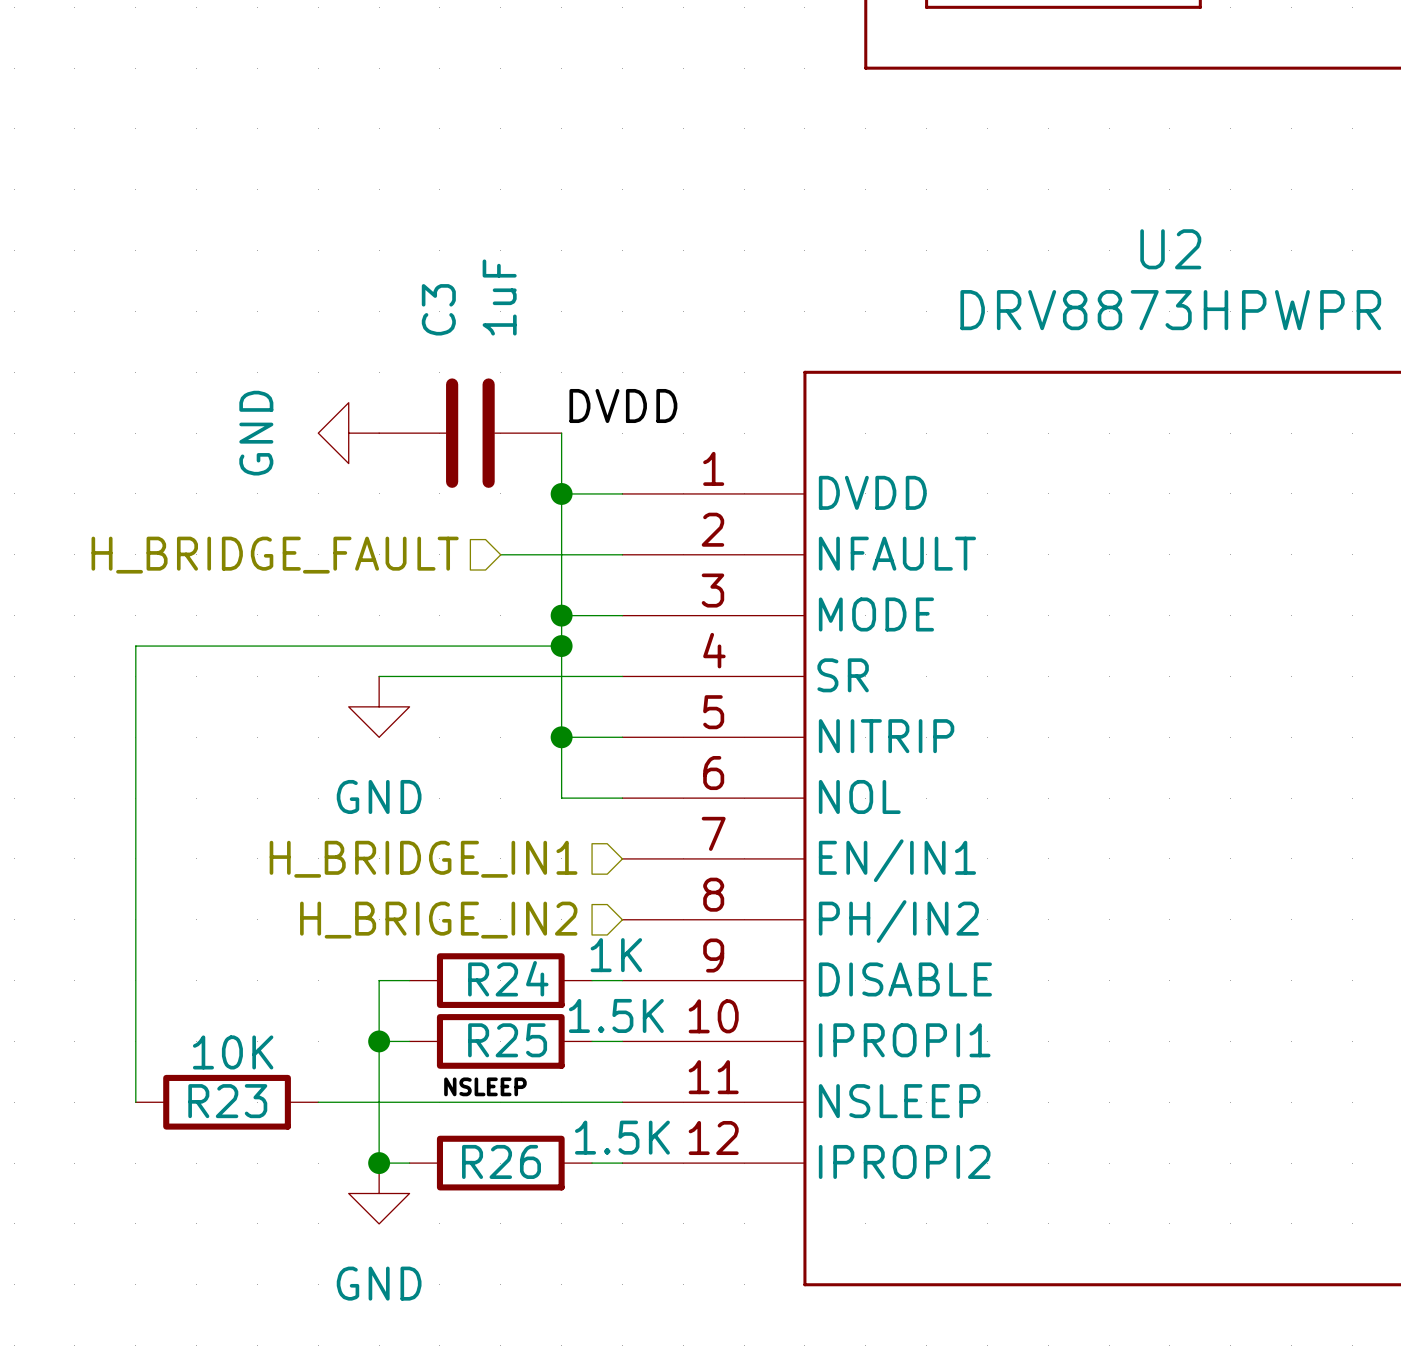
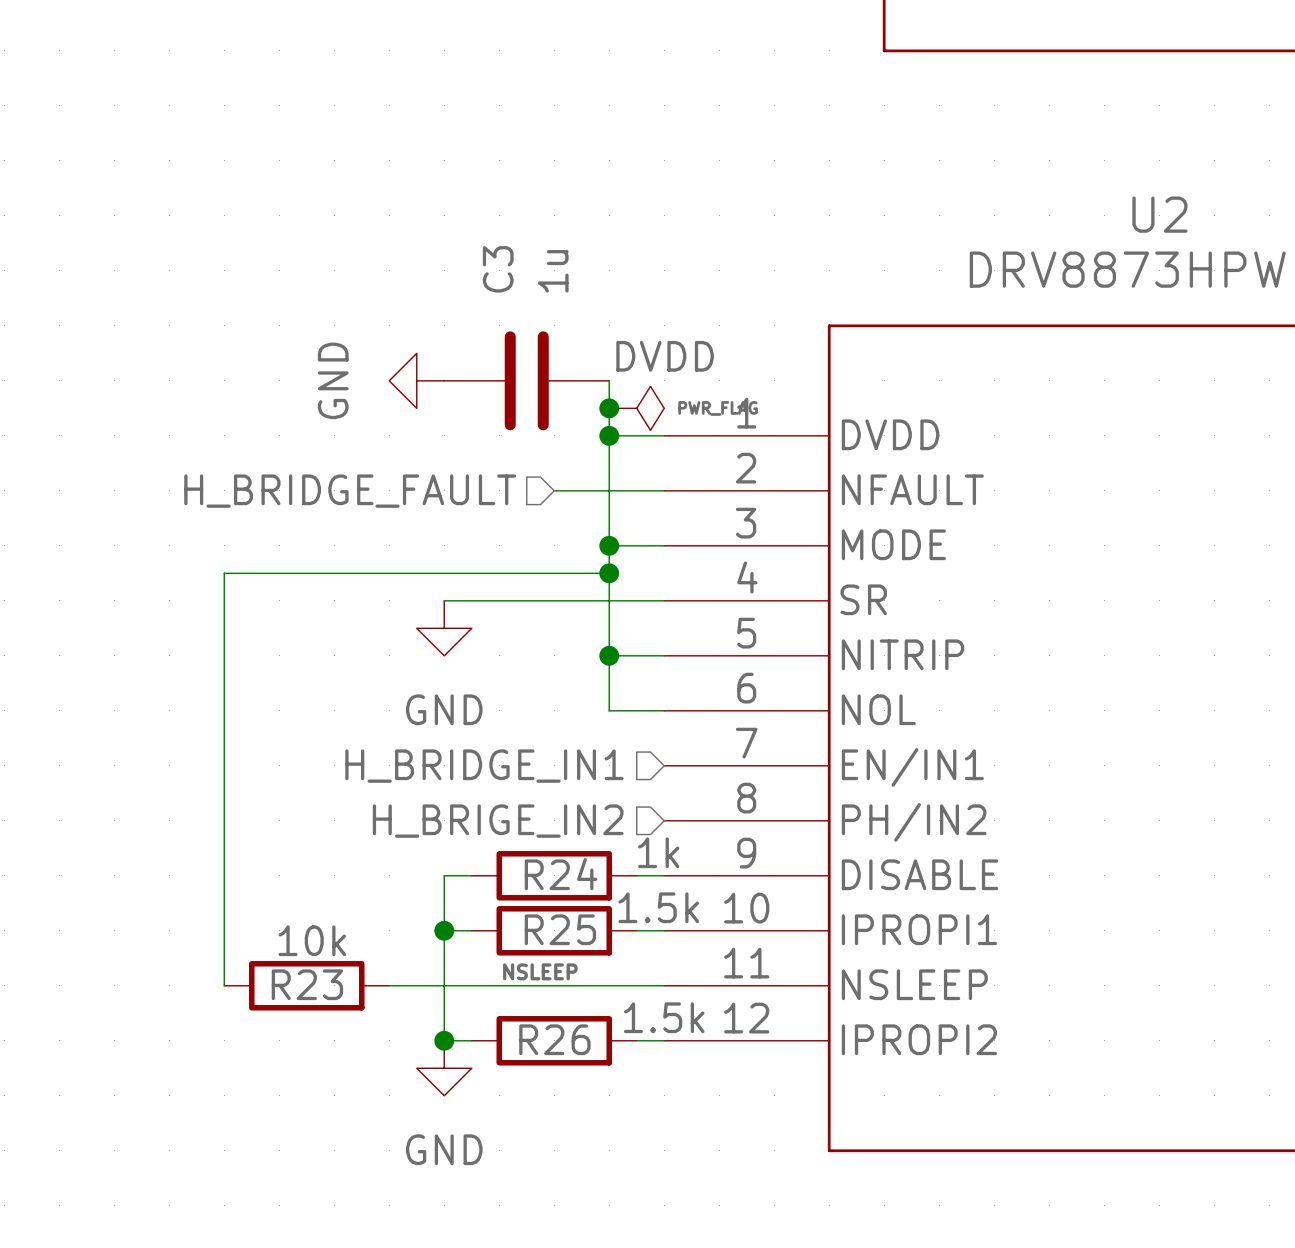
C3 value: 1uF (499, 297) -> 1u (553, 271)
junction: none -> (609, 408)
power symbol: none -> PWR_FLAG (636, 408)
R24 value: 1K (616, 955) -> 1k (658, 852)
R25 value: 1.5K (616, 1015) -> 1.5k (658, 907)
R23 value: 10K (233, 1052) -> 10k (312, 940)
R26 value: 1.5K (622, 1137) -> 1.5k (664, 1017)

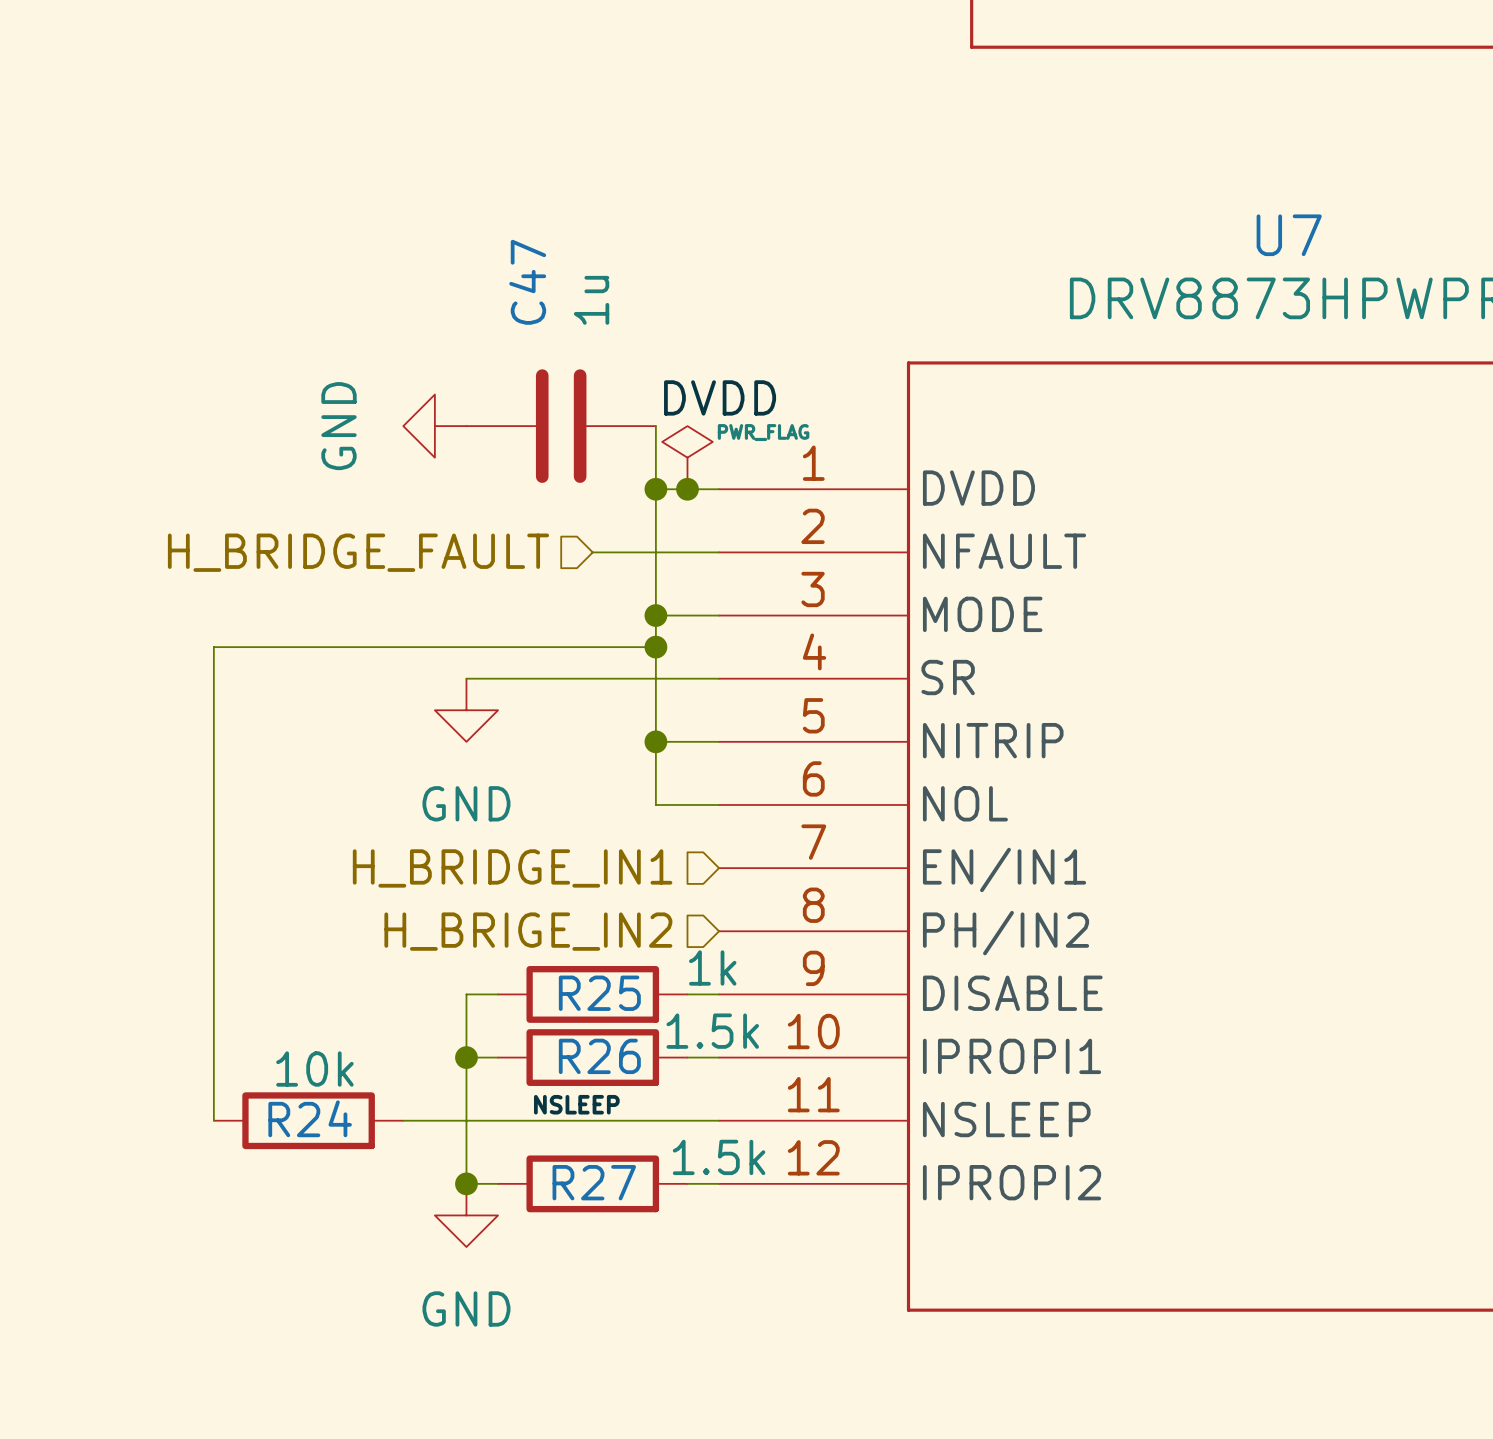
U2 name: U2 (1159, 214) -> U7 (1289, 235)
C3 name: C3 (498, 269) -> C47 (527, 282)
junction position: (609, 408) -> (687, 489)
power symbol rotation: 0° (636, 408) -> 90° counterclockwise (687, 457)
R24 name: R24 (561, 874) -> R25 (599, 993)
R25 name: R25 (560, 929) -> R26 (599, 1056)
R23 name: R23 (307, 984) -> R24 (310, 1118)
R26 name: R26 (554, 1039) -> R27 (594, 1182)

